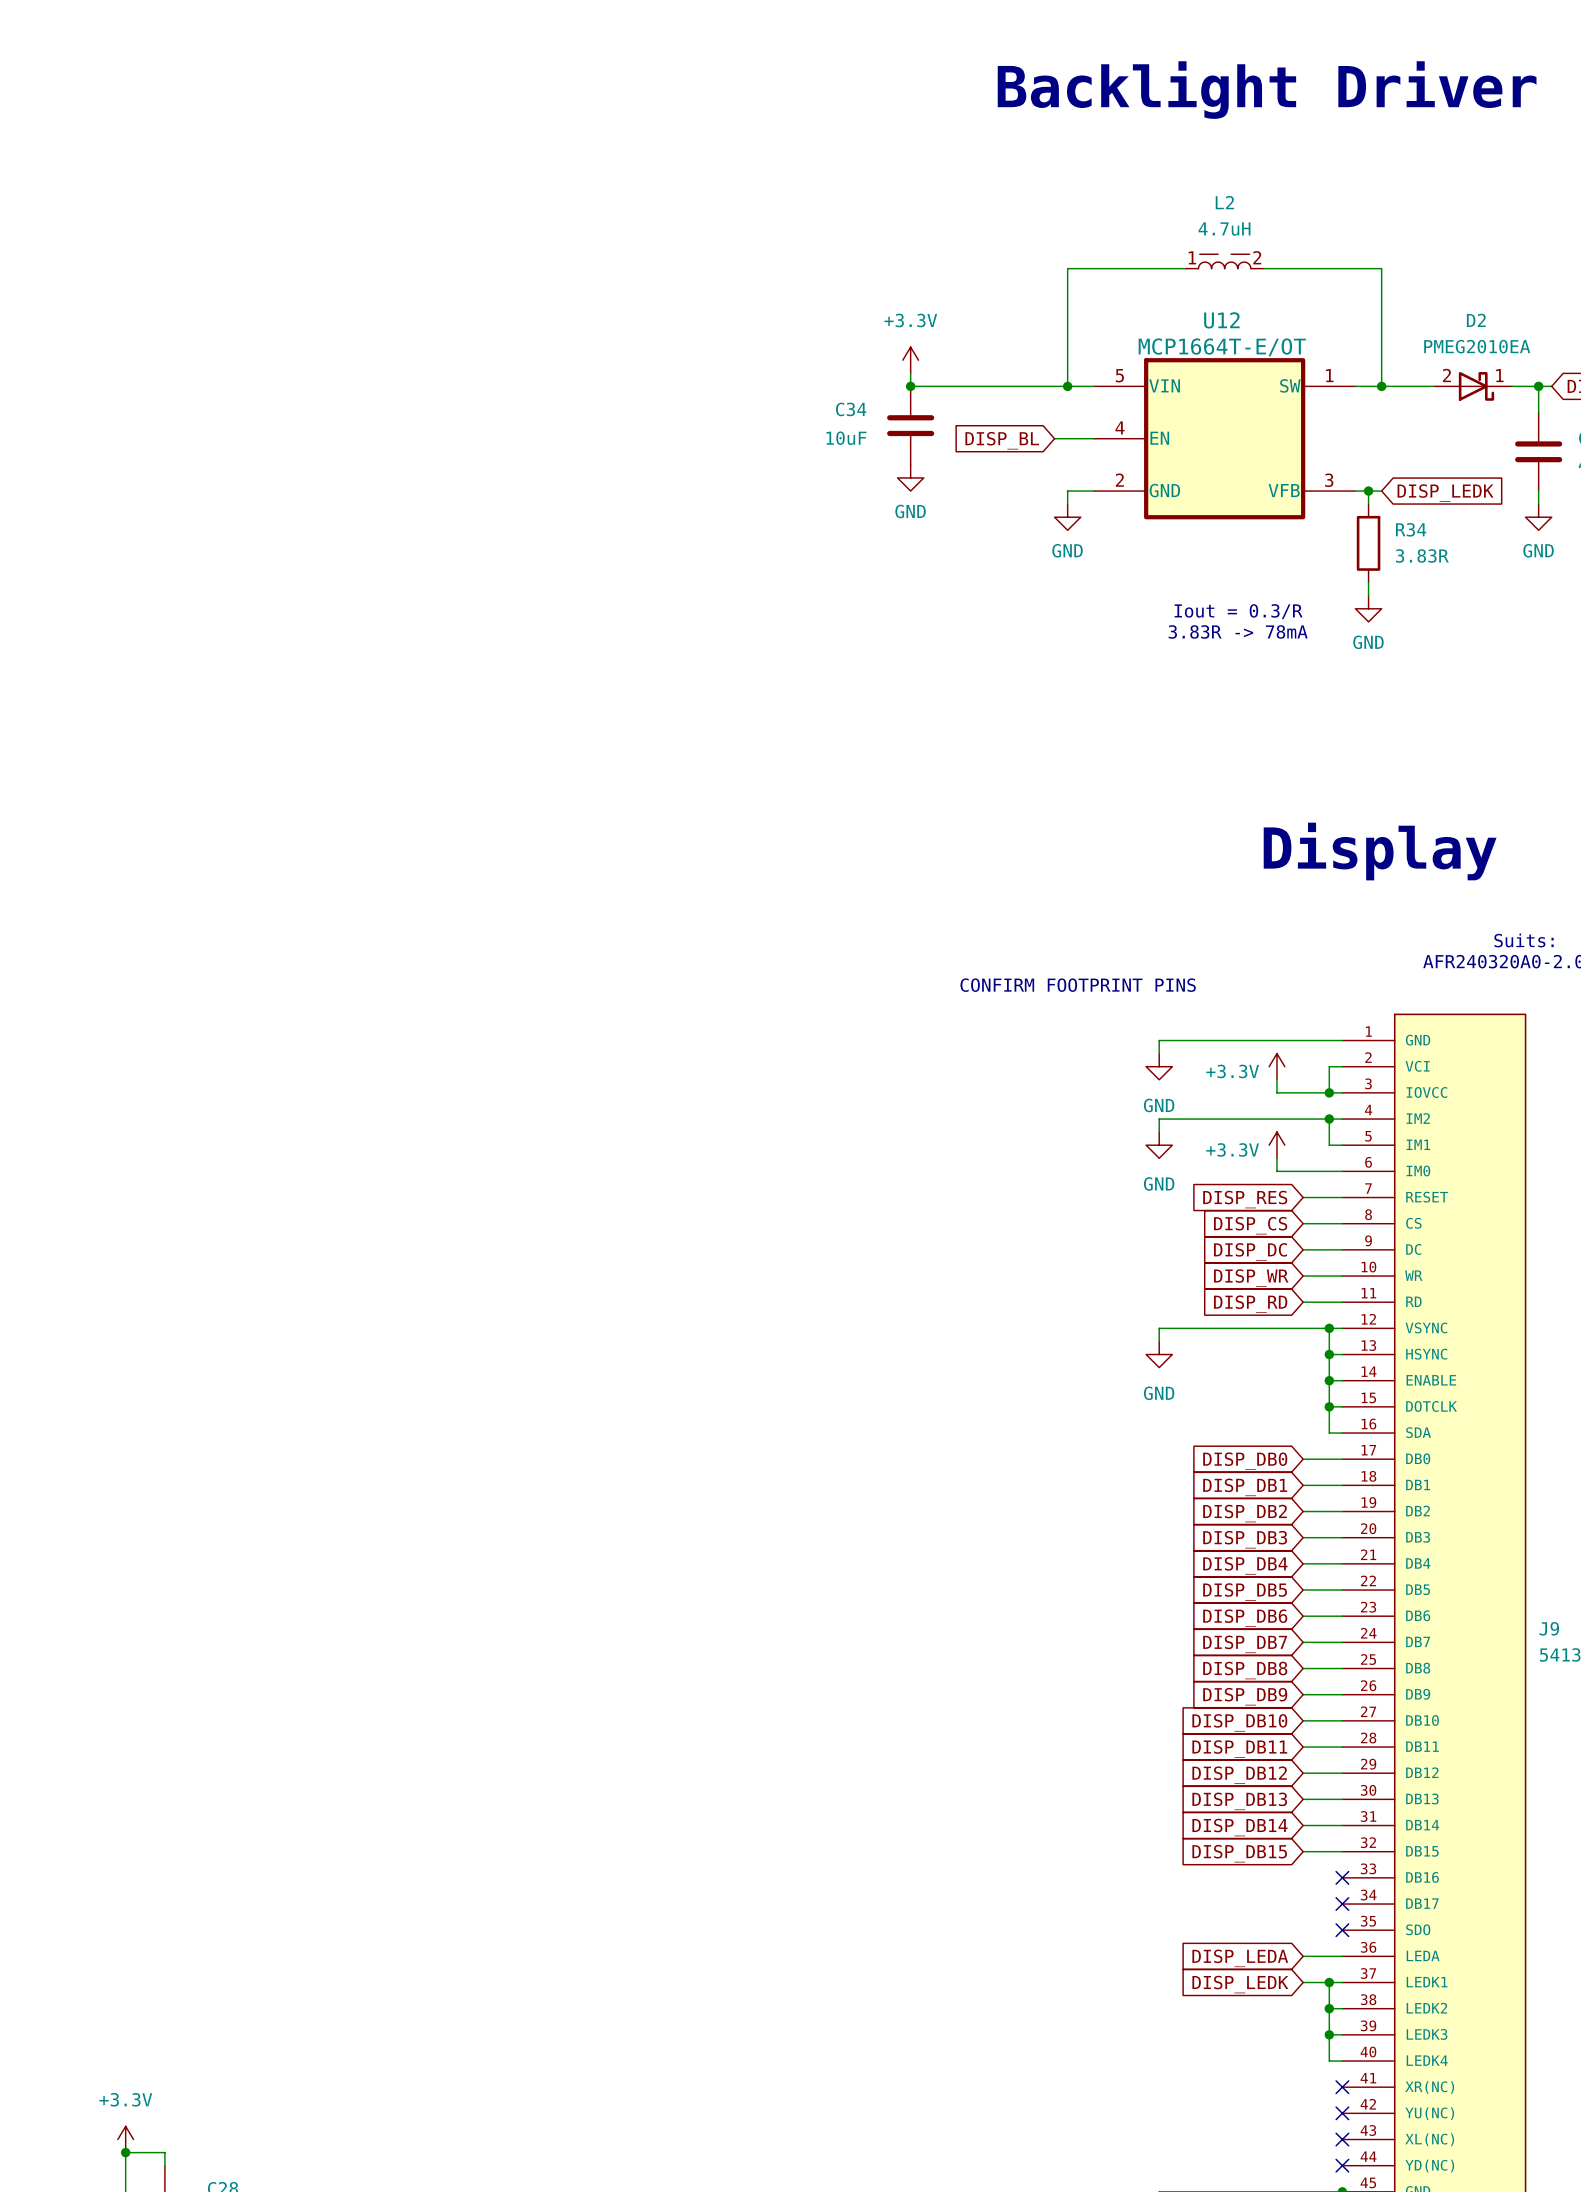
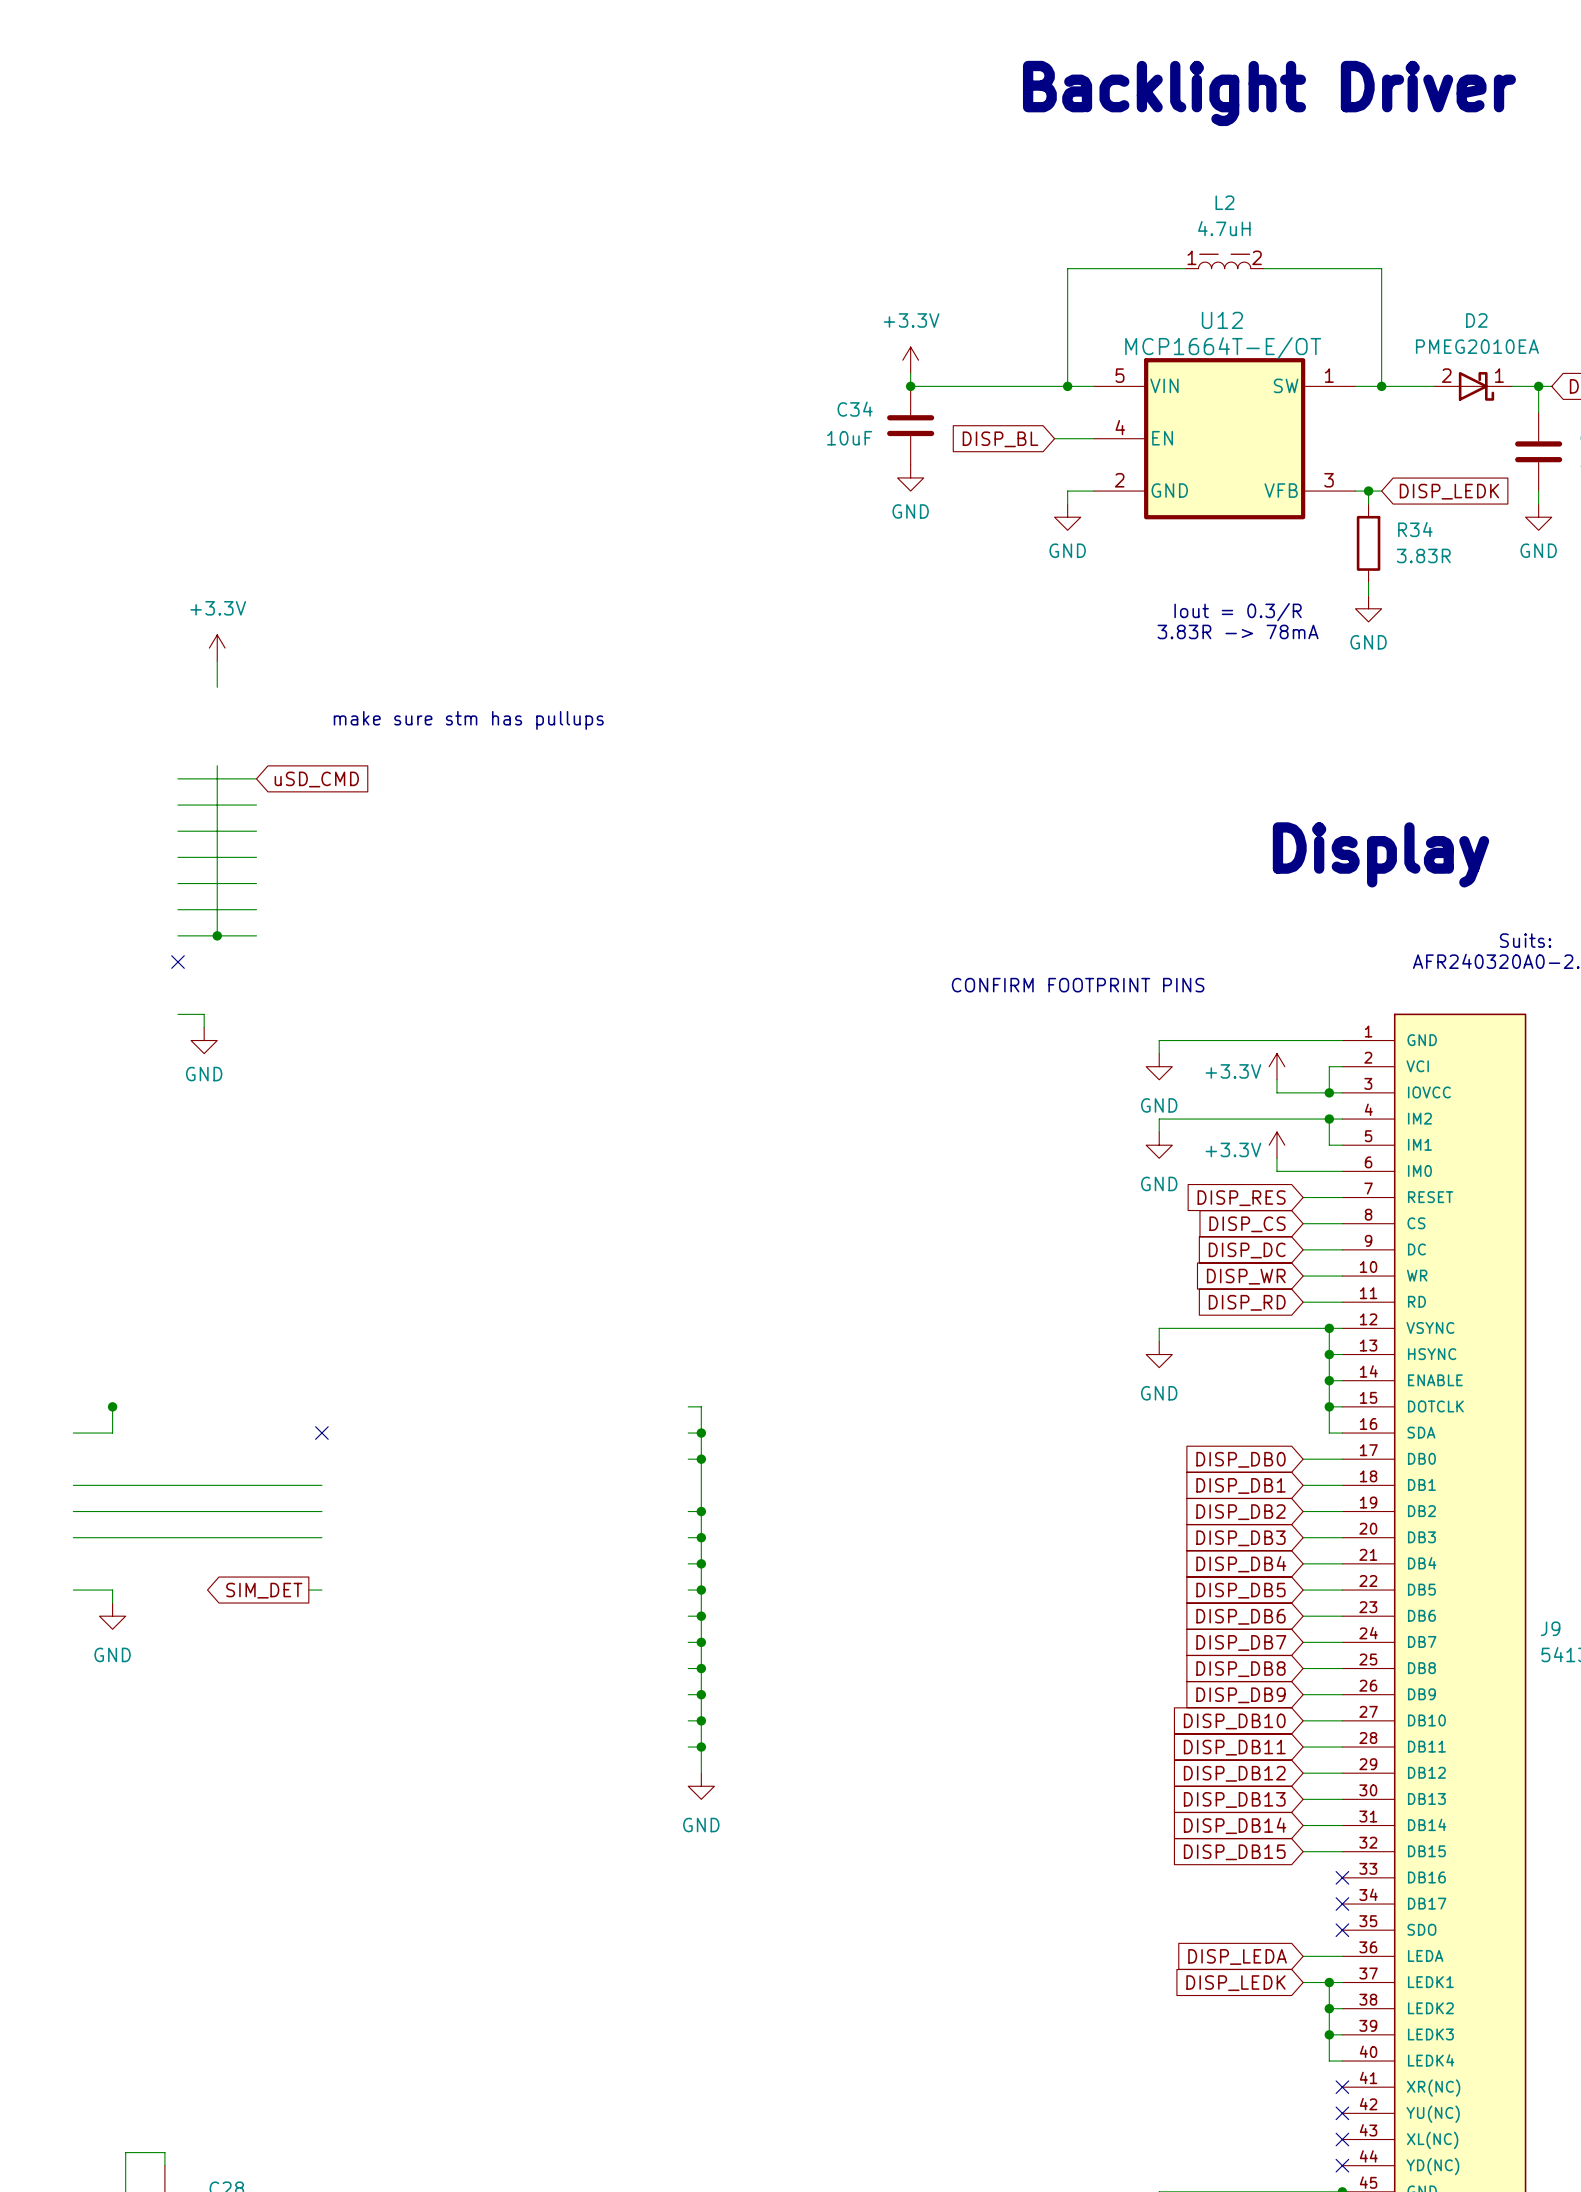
power symbol: none -> +3.3V (217, 648)
wire: none -> (217, 661) (217, 687)
text: none -> make sure stm has pullups (468, 720)
wire: none -> (217, 765) (217, 935)
wire: none -> (178, 778) (256, 778)
global label: none -> uSD_CMD (316, 779)
wire: none -> (178, 805) (256, 805)
wire: none -> (178, 831) (256, 831)
wire: none -> (178, 857) (256, 857)
wire: none -> (178, 883) (256, 883)
wire: none -> (178, 909) (256, 909)
wire: none -> (178, 935) (256, 935)
junction: none -> (217, 935)
no-connect mark: none -> (178, 962)
wire: none -> (178, 1014) (204, 1014) (204, 1027)
power symbol: none -> GND (204, 1040)
wire: none -> (112, 1406) (112, 1433) (73, 1433)
junction: none -> (112, 1406)
wire: none -> (688, 1406) (701, 1406) (701, 1773)
no-connect mark: none -> (321, 1433)
wire: none -> (688, 1433) (701, 1433)
junction: none -> (701, 1433)
wire: none -> (688, 1459) (701, 1459)
junction: none -> (701, 1459)
wire: none -> (73, 1485) (321, 1485)
wire: none -> (73, 1511) (321, 1511)
wire: none -> (688, 1511) (701, 1511)
junction: none -> (701, 1511)
wire: none -> (73, 1537) (321, 1537)
wire: none -> (688, 1537) (701, 1537)
junction: none -> (701, 1537)
wire: none -> (688, 1563) (701, 1563)
junction: none -> (701, 1563)
wire: none -> (73, 1590) (112, 1590) (112, 1603)
wire: none -> (308, 1590) (321, 1590)
wire: none -> (688, 1590) (701, 1590)
junction: none -> (701, 1590)
global label: none -> SIM_DET (264, 1590)
power symbol: none -> GND (112, 1616)
wire: none -> (688, 1616) (701, 1616)
junction: none -> (701, 1616)
wire: none -> (688, 1642) (701, 1642)
junction: none -> (701, 1642)
wire: none -> (688, 1668) (701, 1668)
junction: none -> (701, 1668)
wire: none -> (688, 1694) (701, 1694)
junction: none -> (701, 1694)
wire: none -> (688, 1720) (701, 1720)
junction: none -> (701, 1720)
wire: none -> (688, 1747) (701, 1747)
junction: none -> (701, 1747)
power symbol: none -> GND (701, 1786)
power symbol: +3.3V (125, 2139) -> none
junction: (125, 2152) -> none

